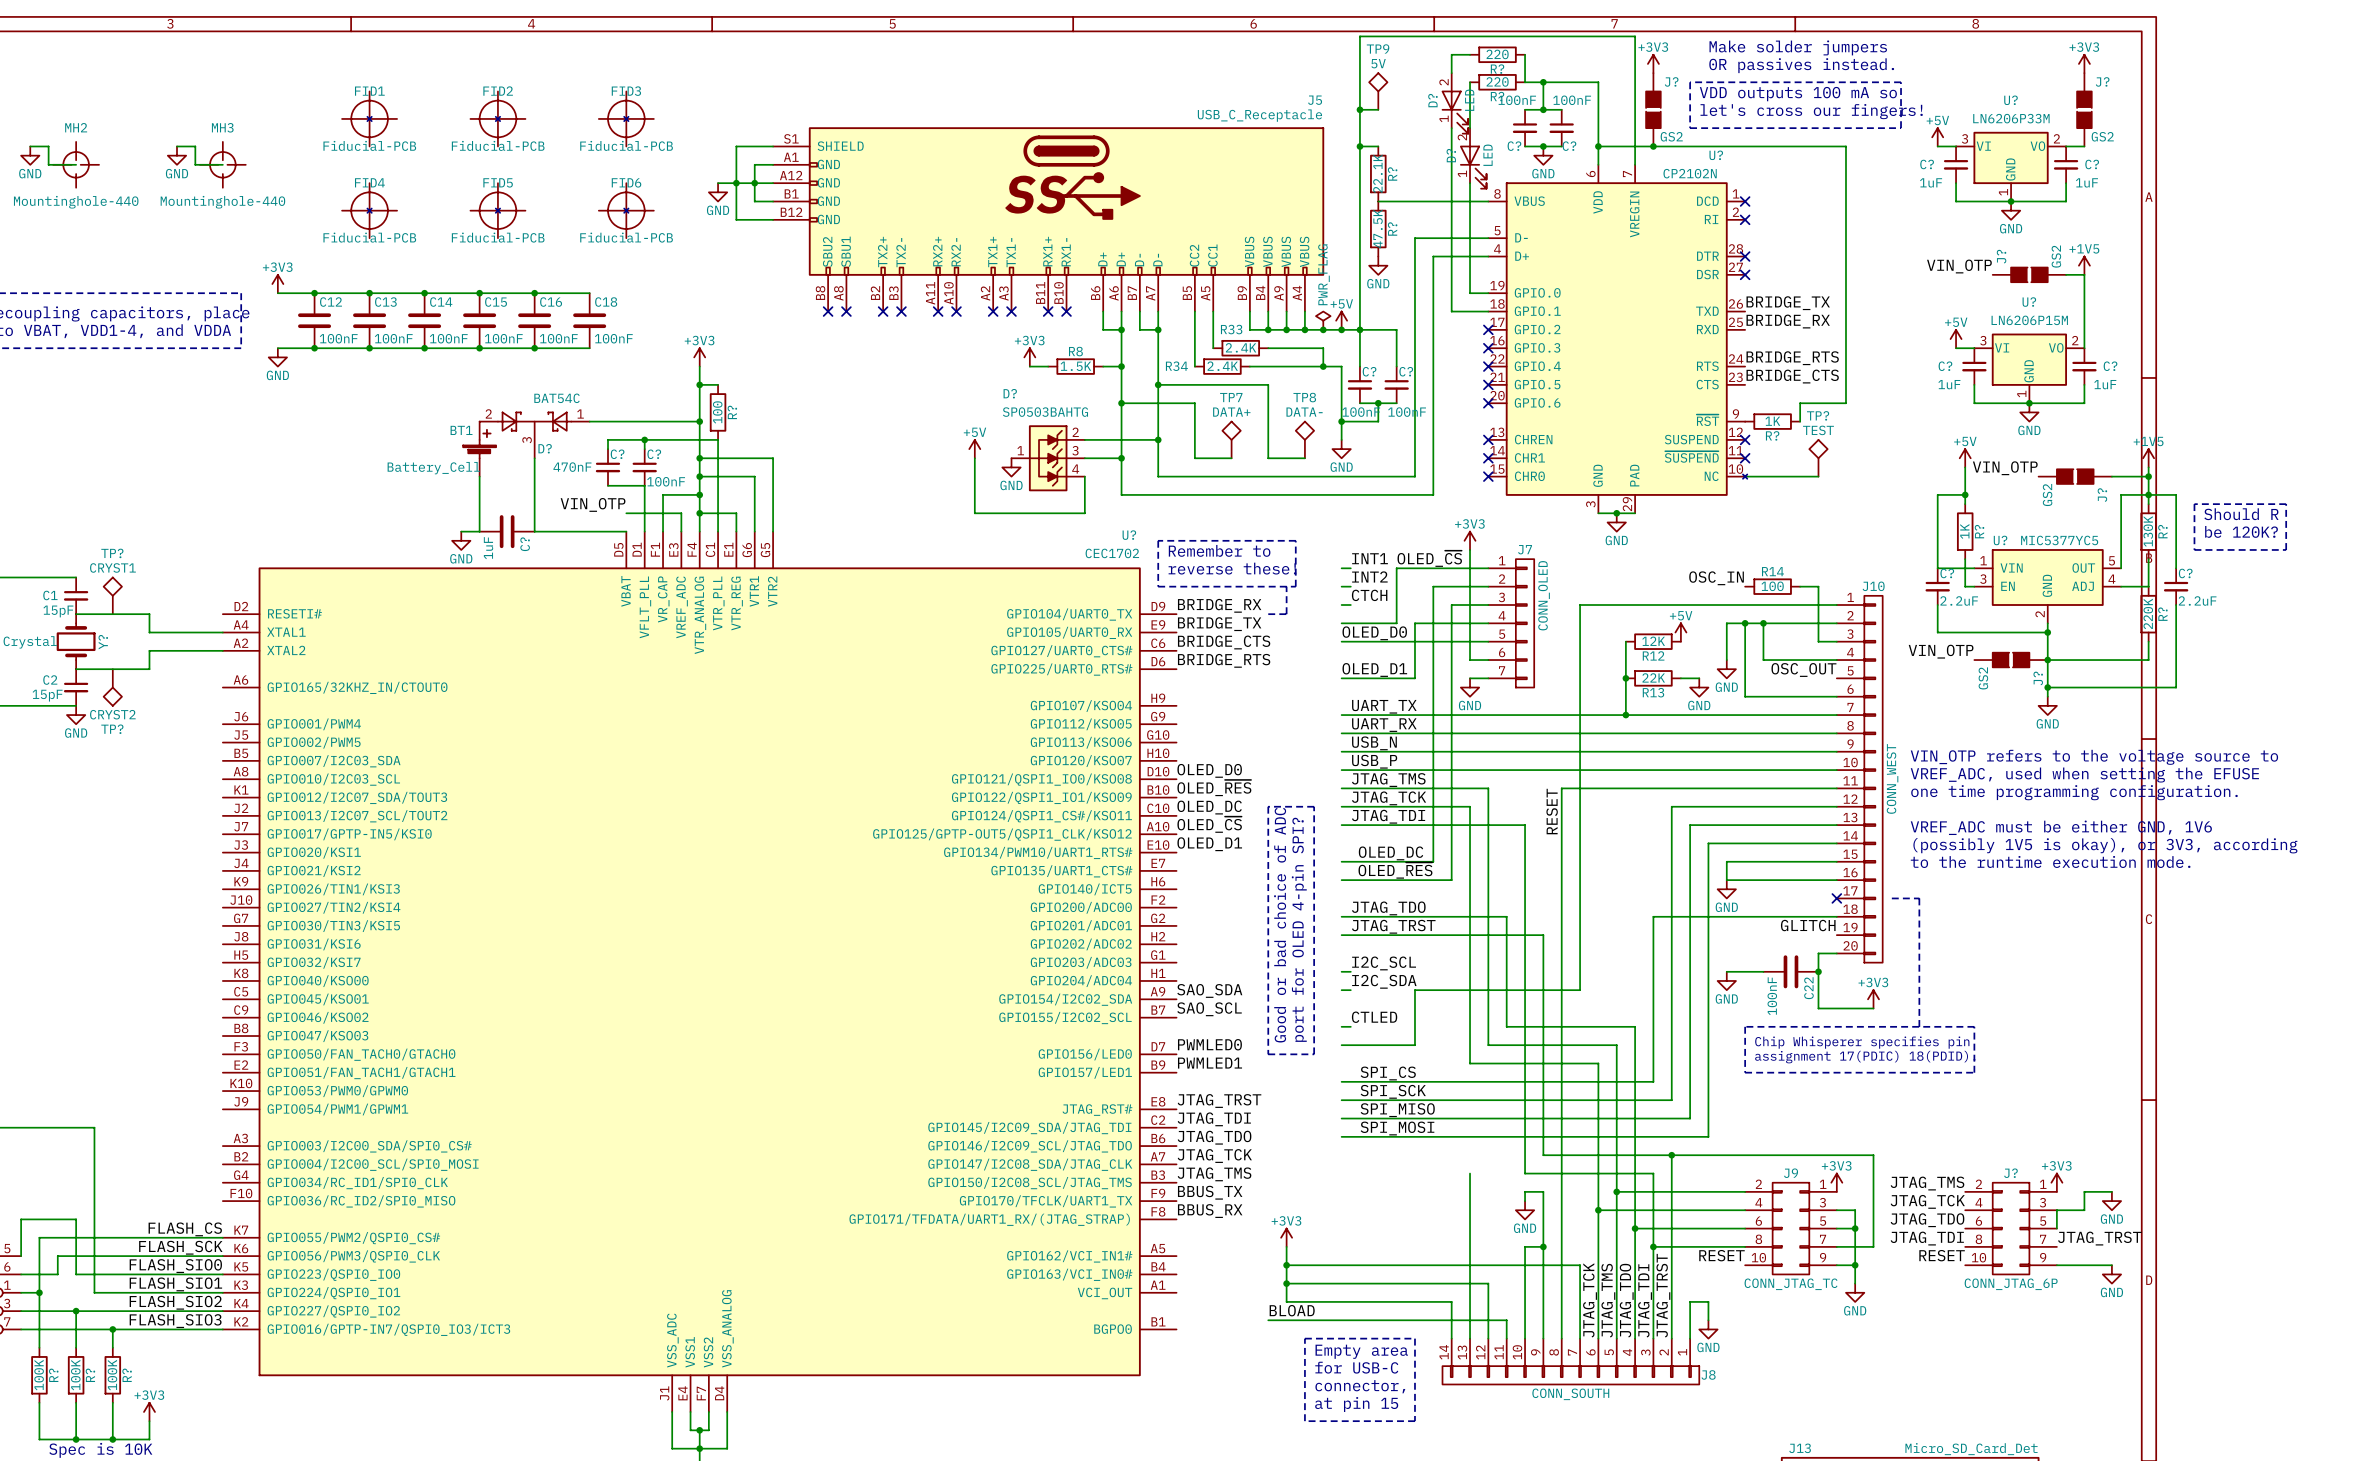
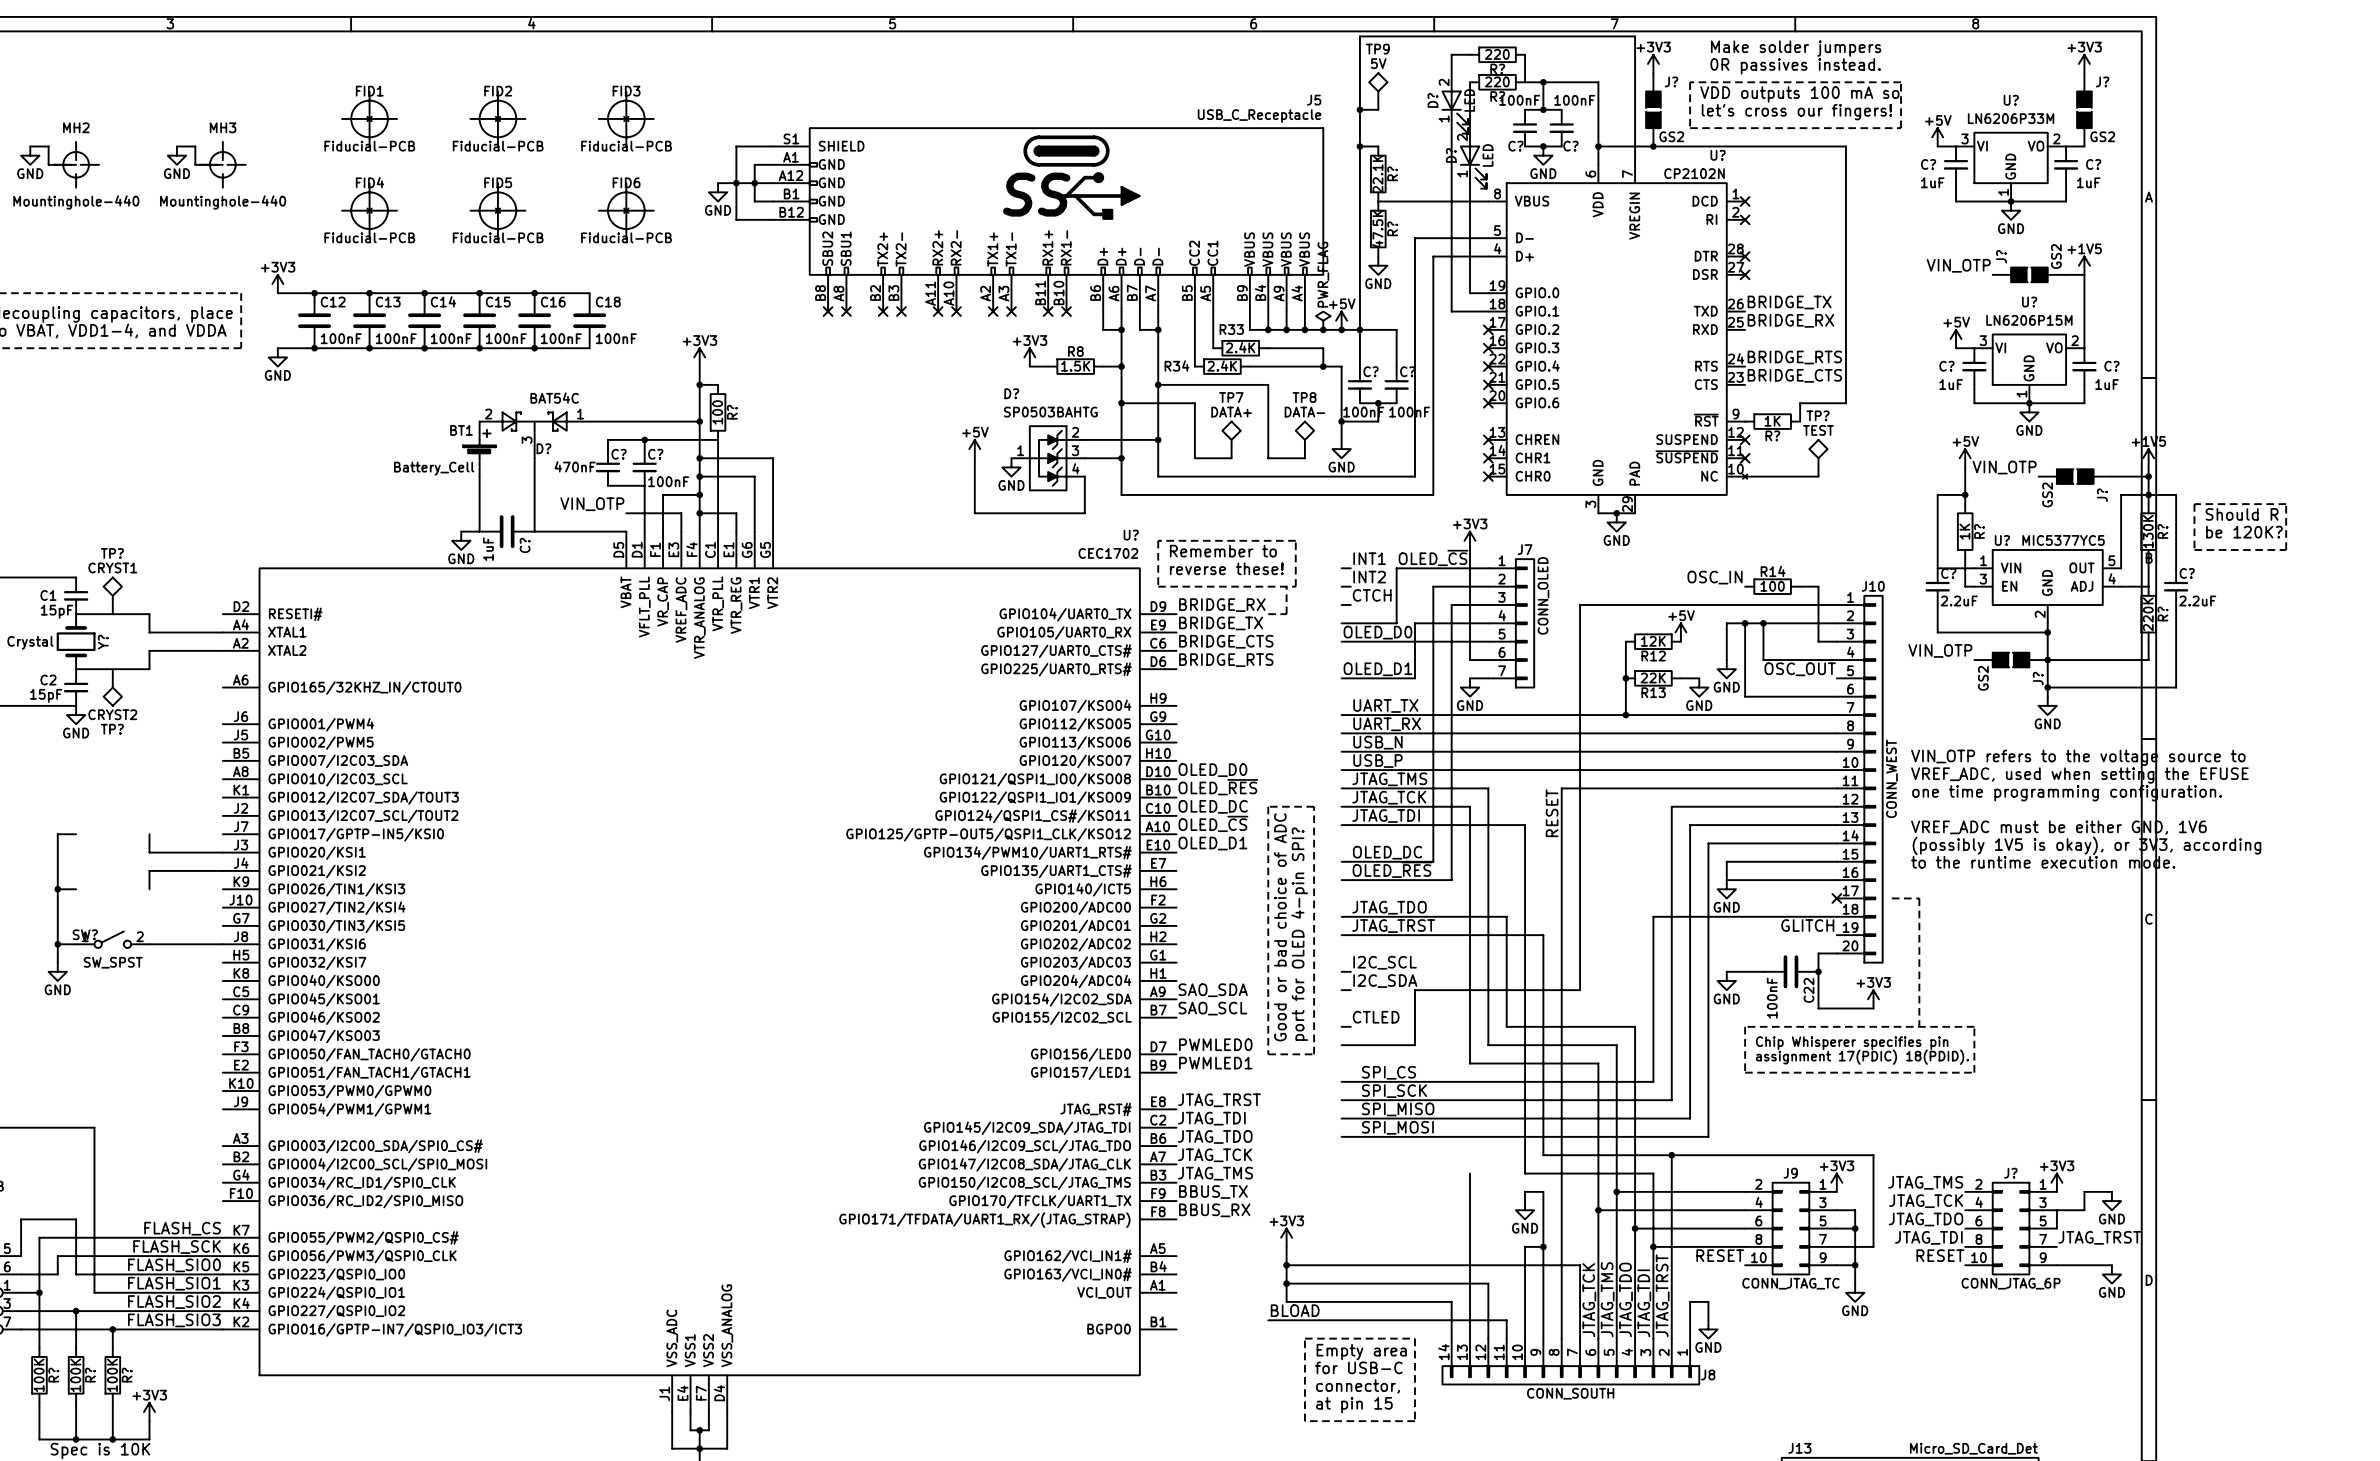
wire: none -> (76, 834) (57, 834) (57, 962)
wire: none -> (149, 834) (149, 852) (222, 852)
wire: none -> (222, 870) (149, 870) (149, 889)
wire: none -> (57, 889) (76, 889)
junction: none -> (57, 889)
SW?: none -> SW_SPST (112, 939)
wire: none -> (57, 944) (76, 944)
junction: none -> (57, 944)
wire: none -> (149, 944) (222, 944)
power symbol: none -> GND (57, 971)

